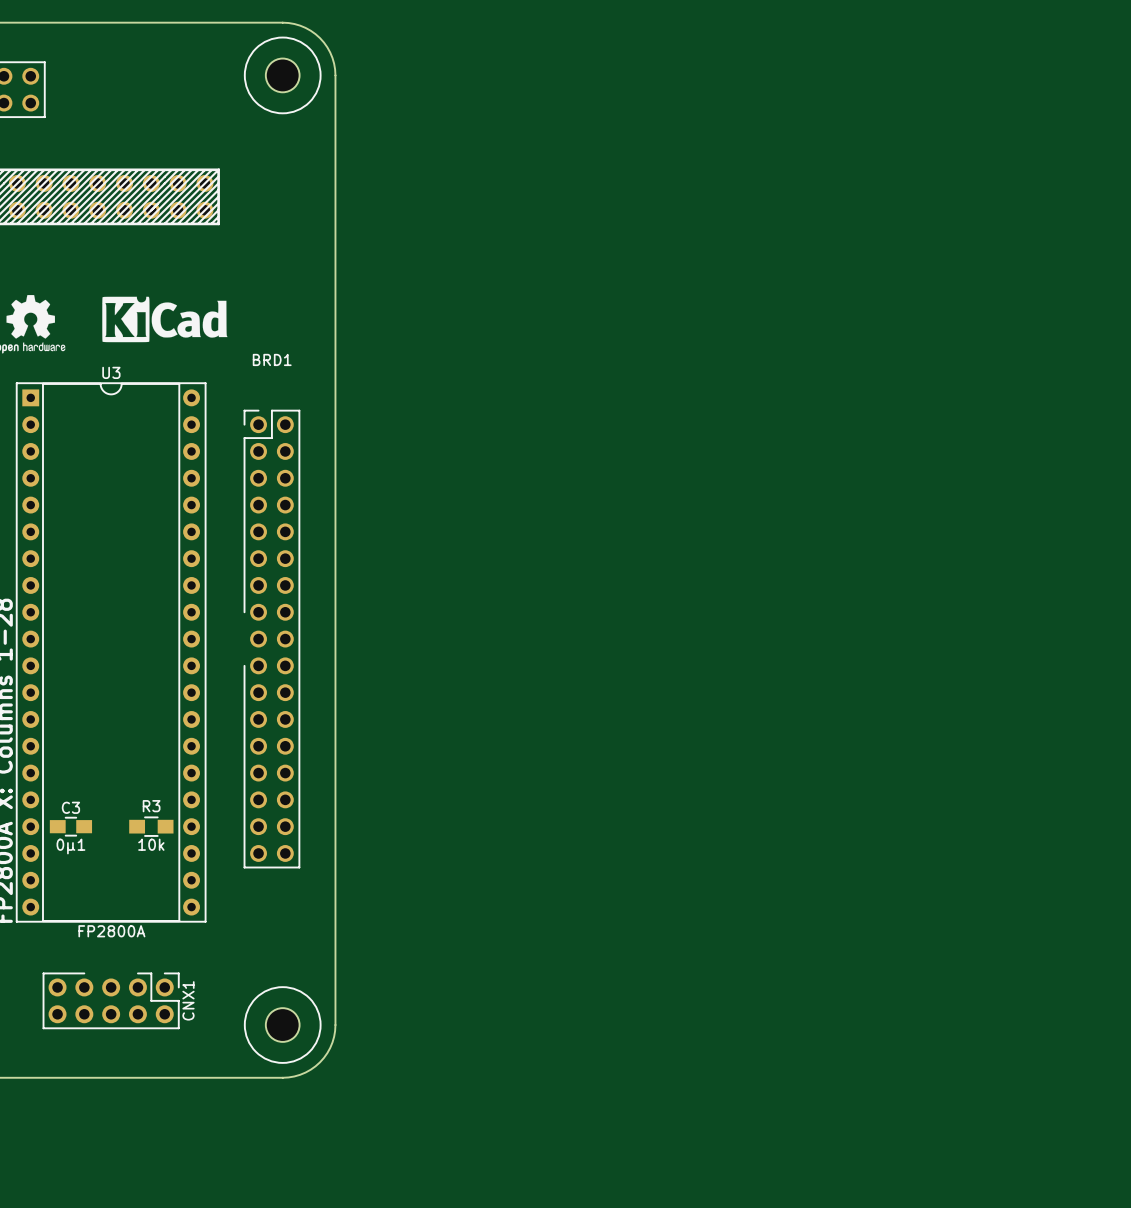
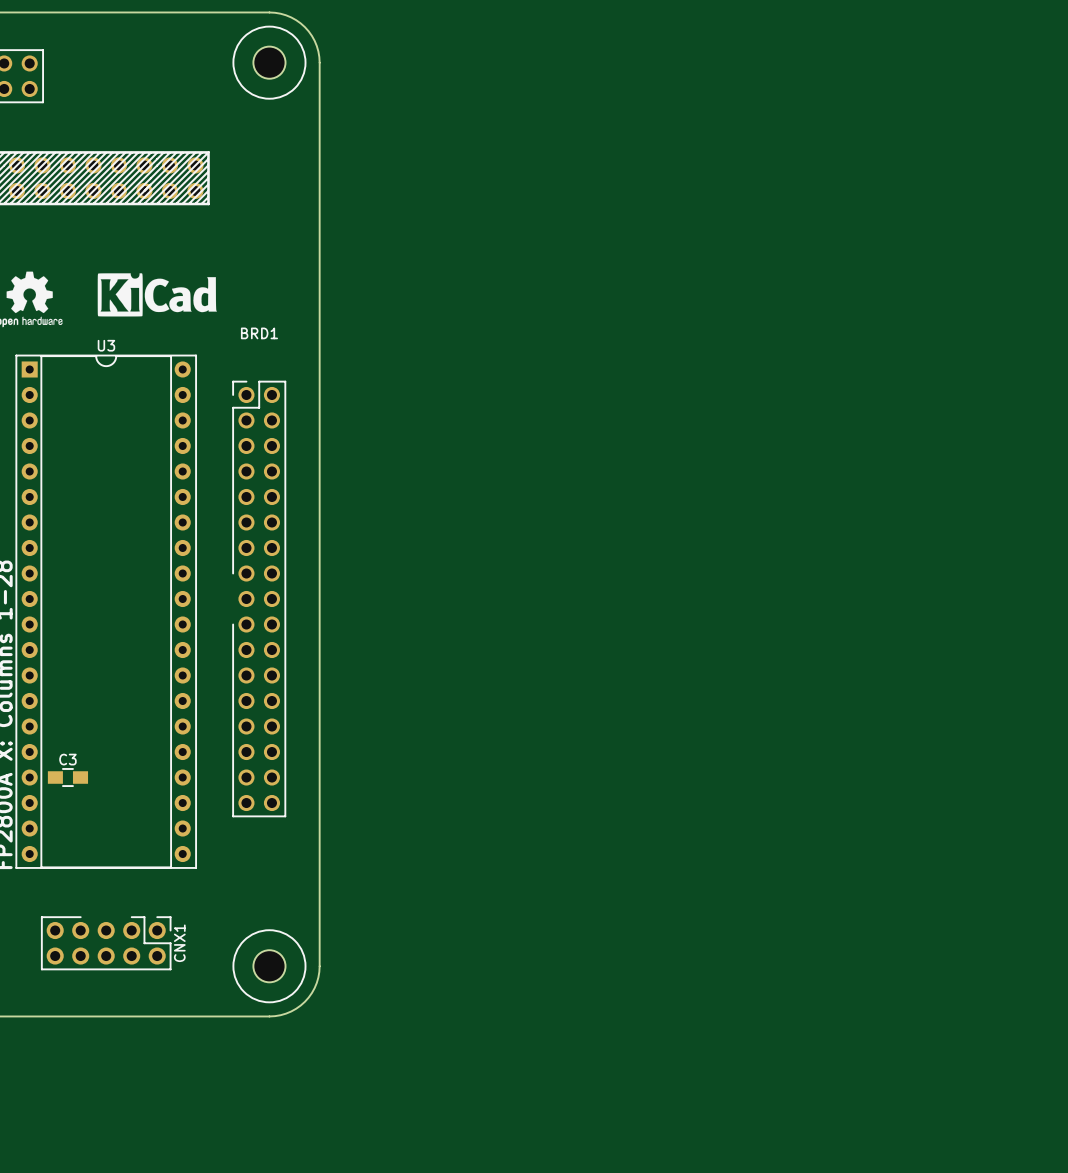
R3: 10k (151, 826) -> none
C3 value: 0μ1 (70, 846) -> none
U3 value: FP2800A (111, 931) -> none

